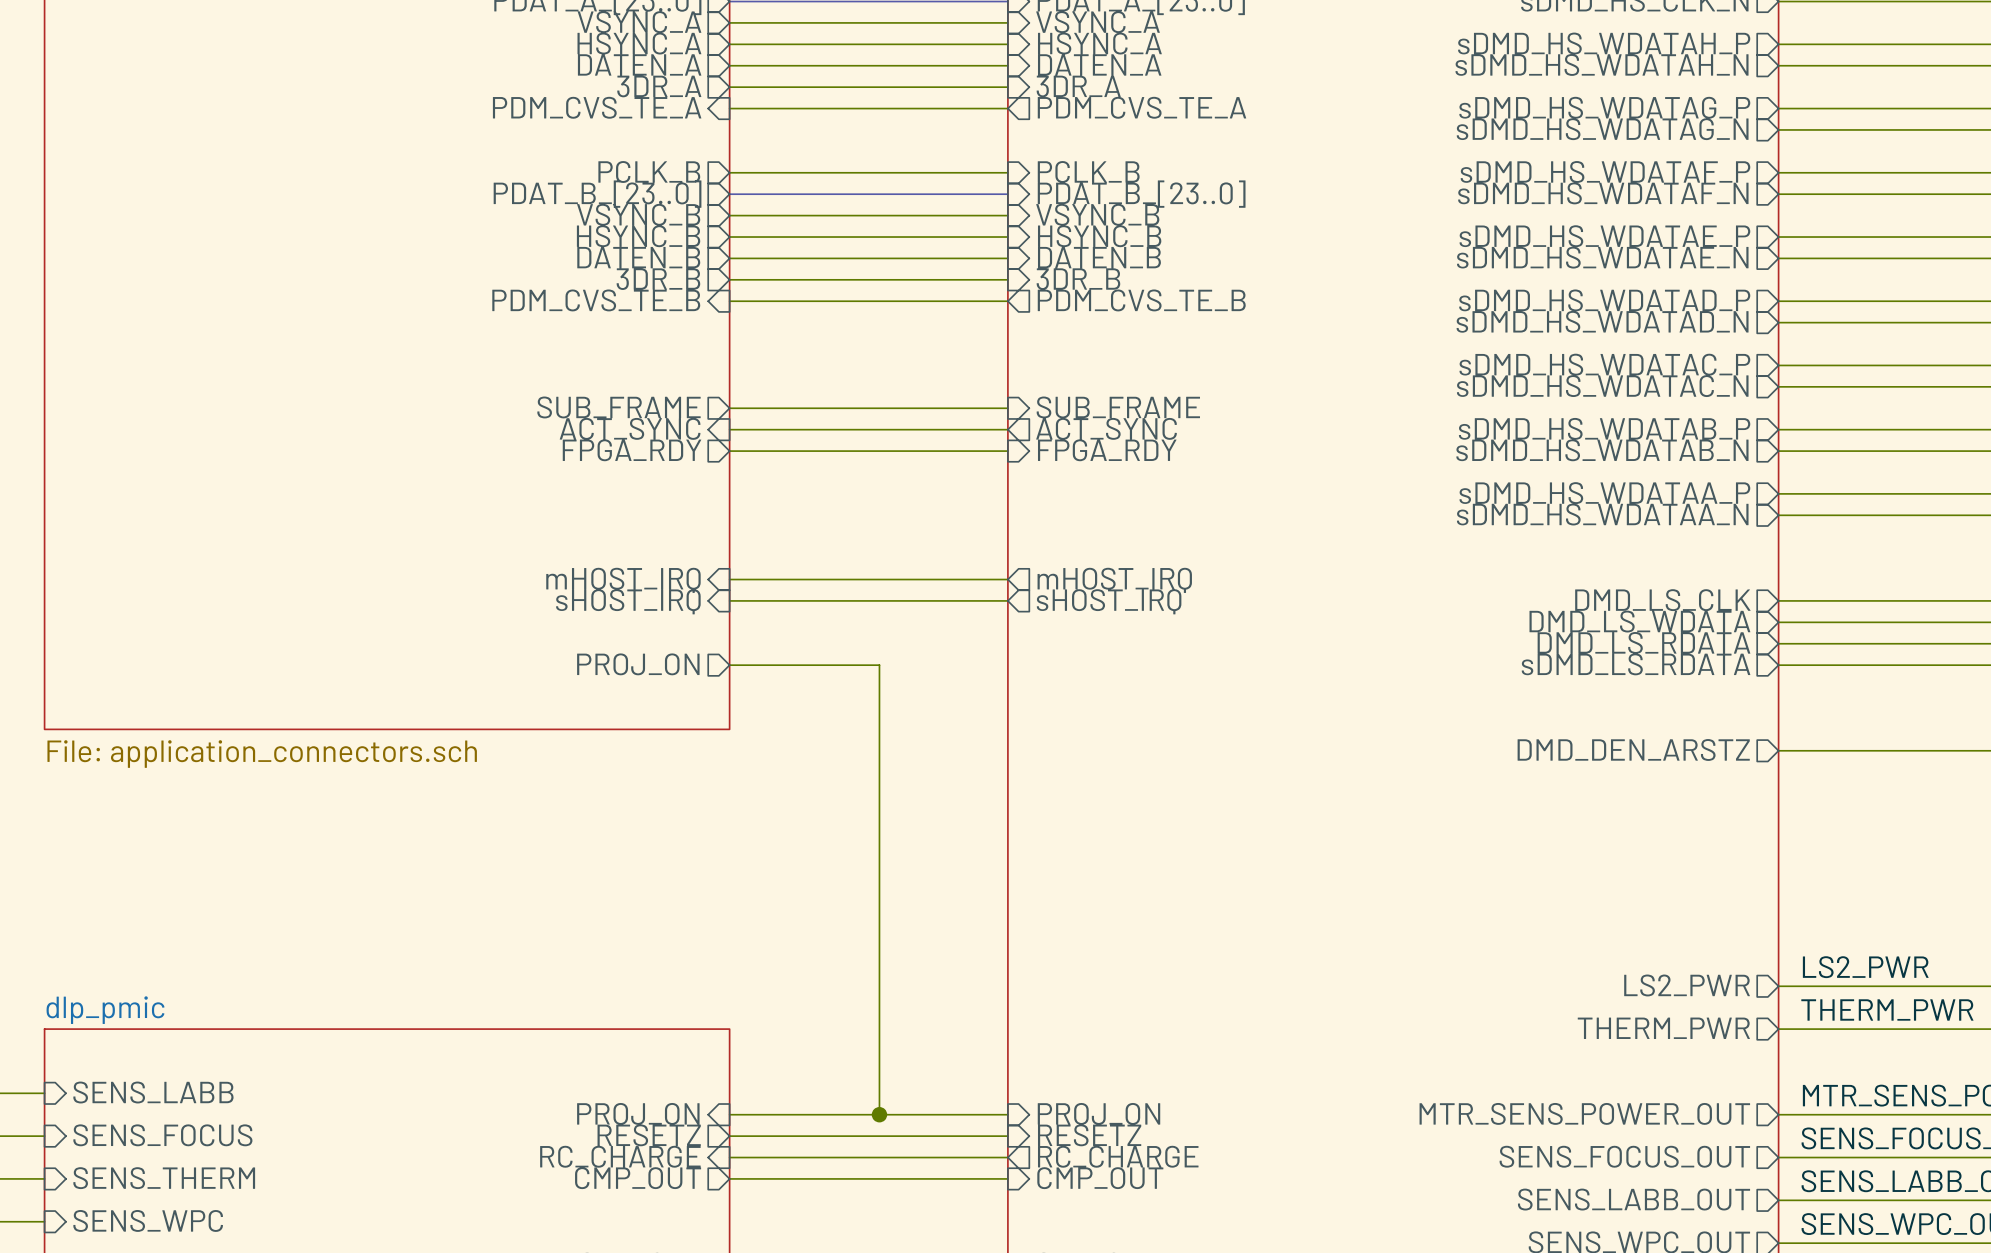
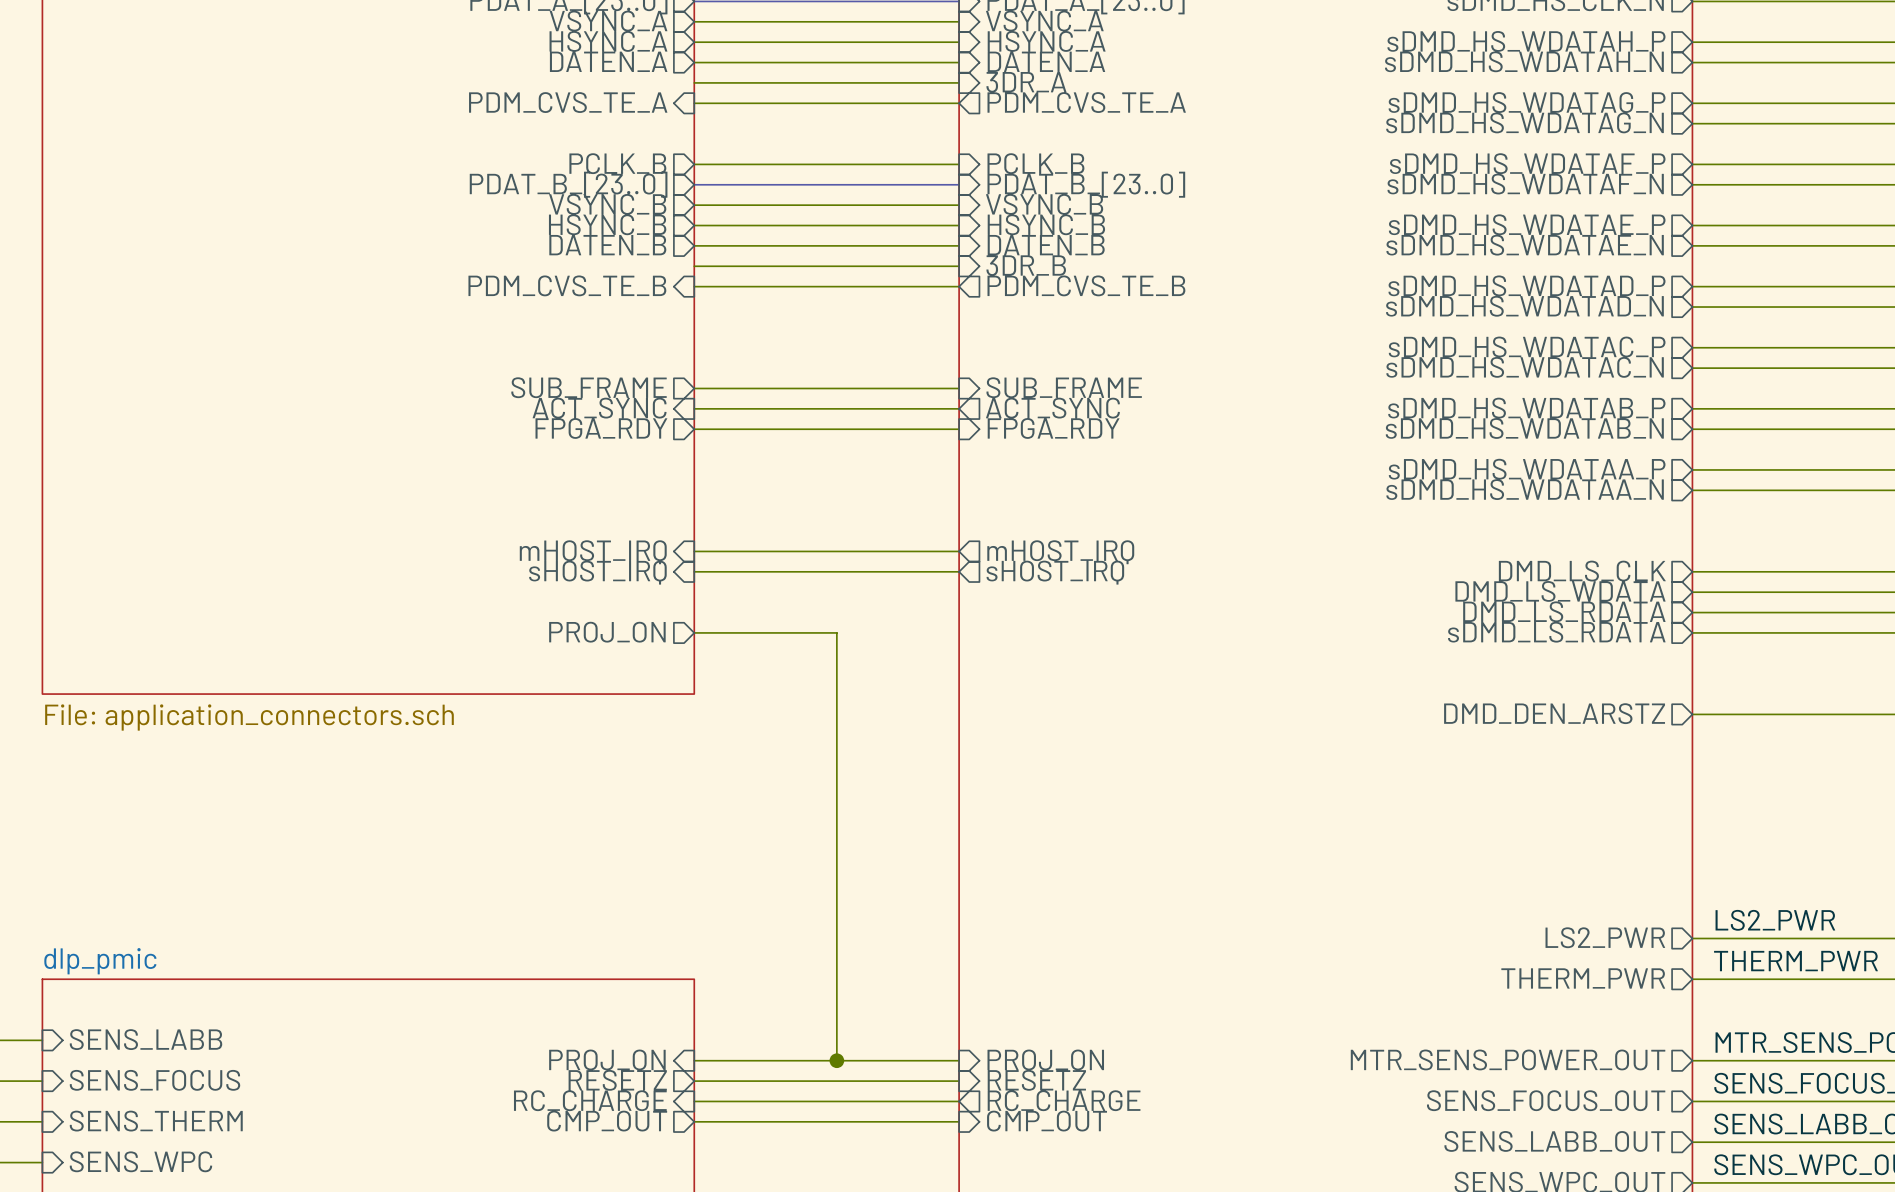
sheet pin: 3DR_A (659, 86) -> none
sheet pin: 3DR_B (658, 279) -> none

